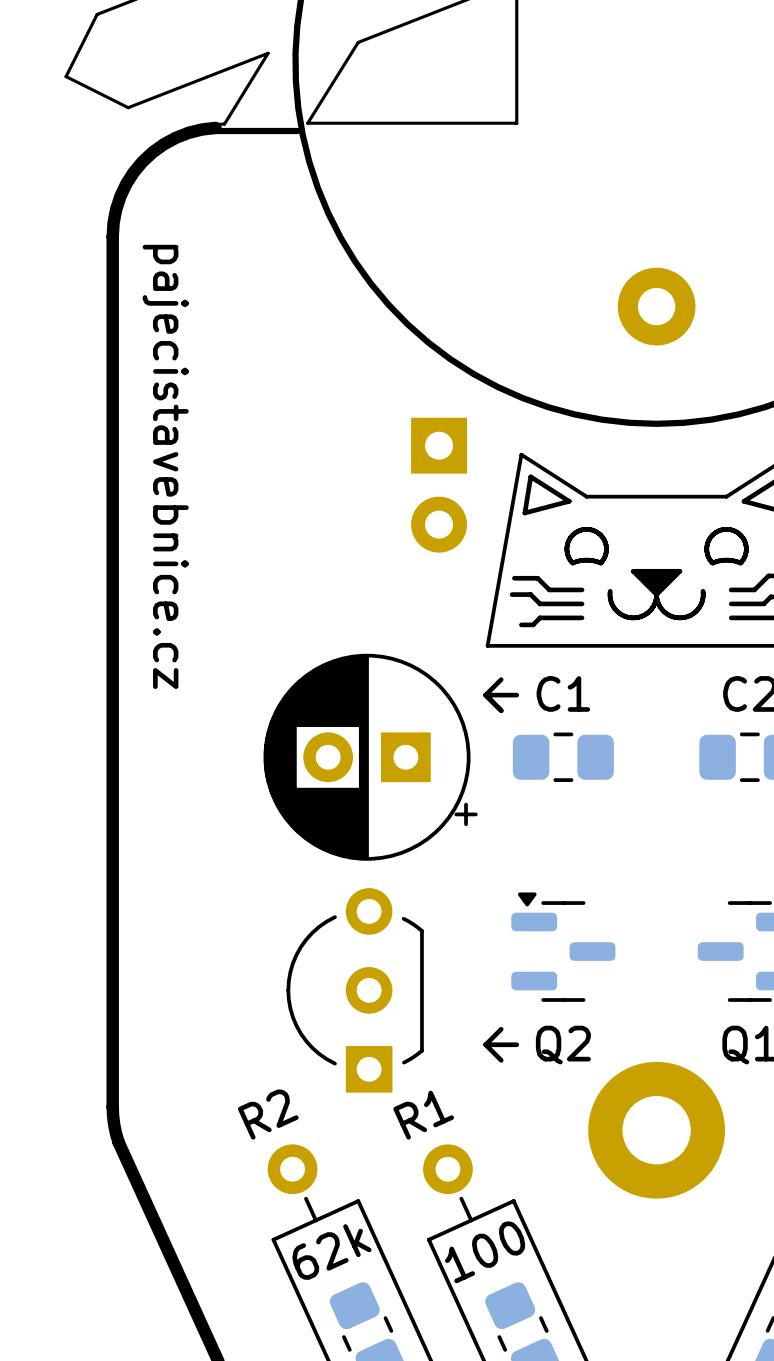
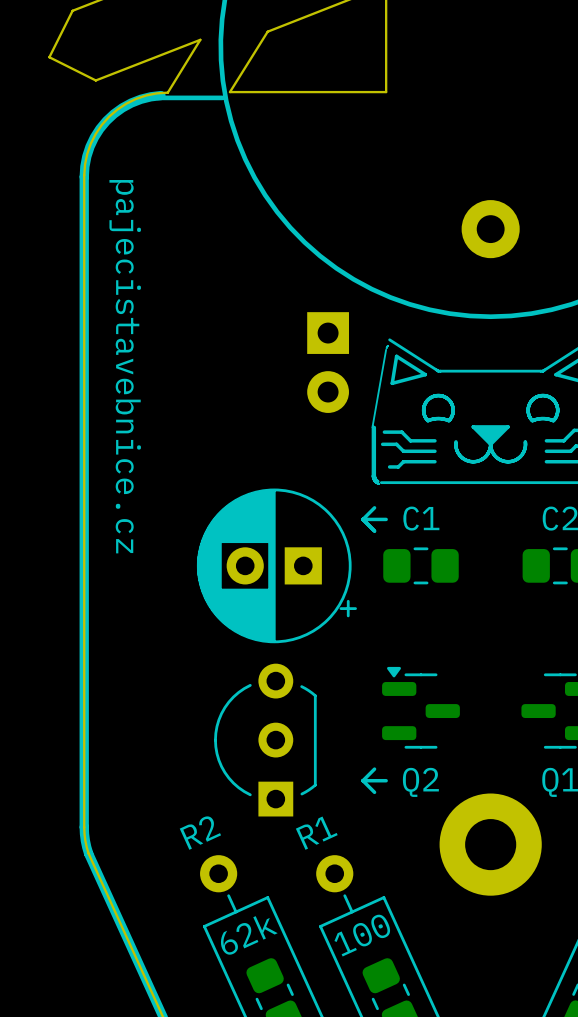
line: (521, 454) (487, 645) (510, 645) -> none
line: none -> (386, 349) (372, 426) (372, 475)
line: none -> (374, 427) (374, 475)

